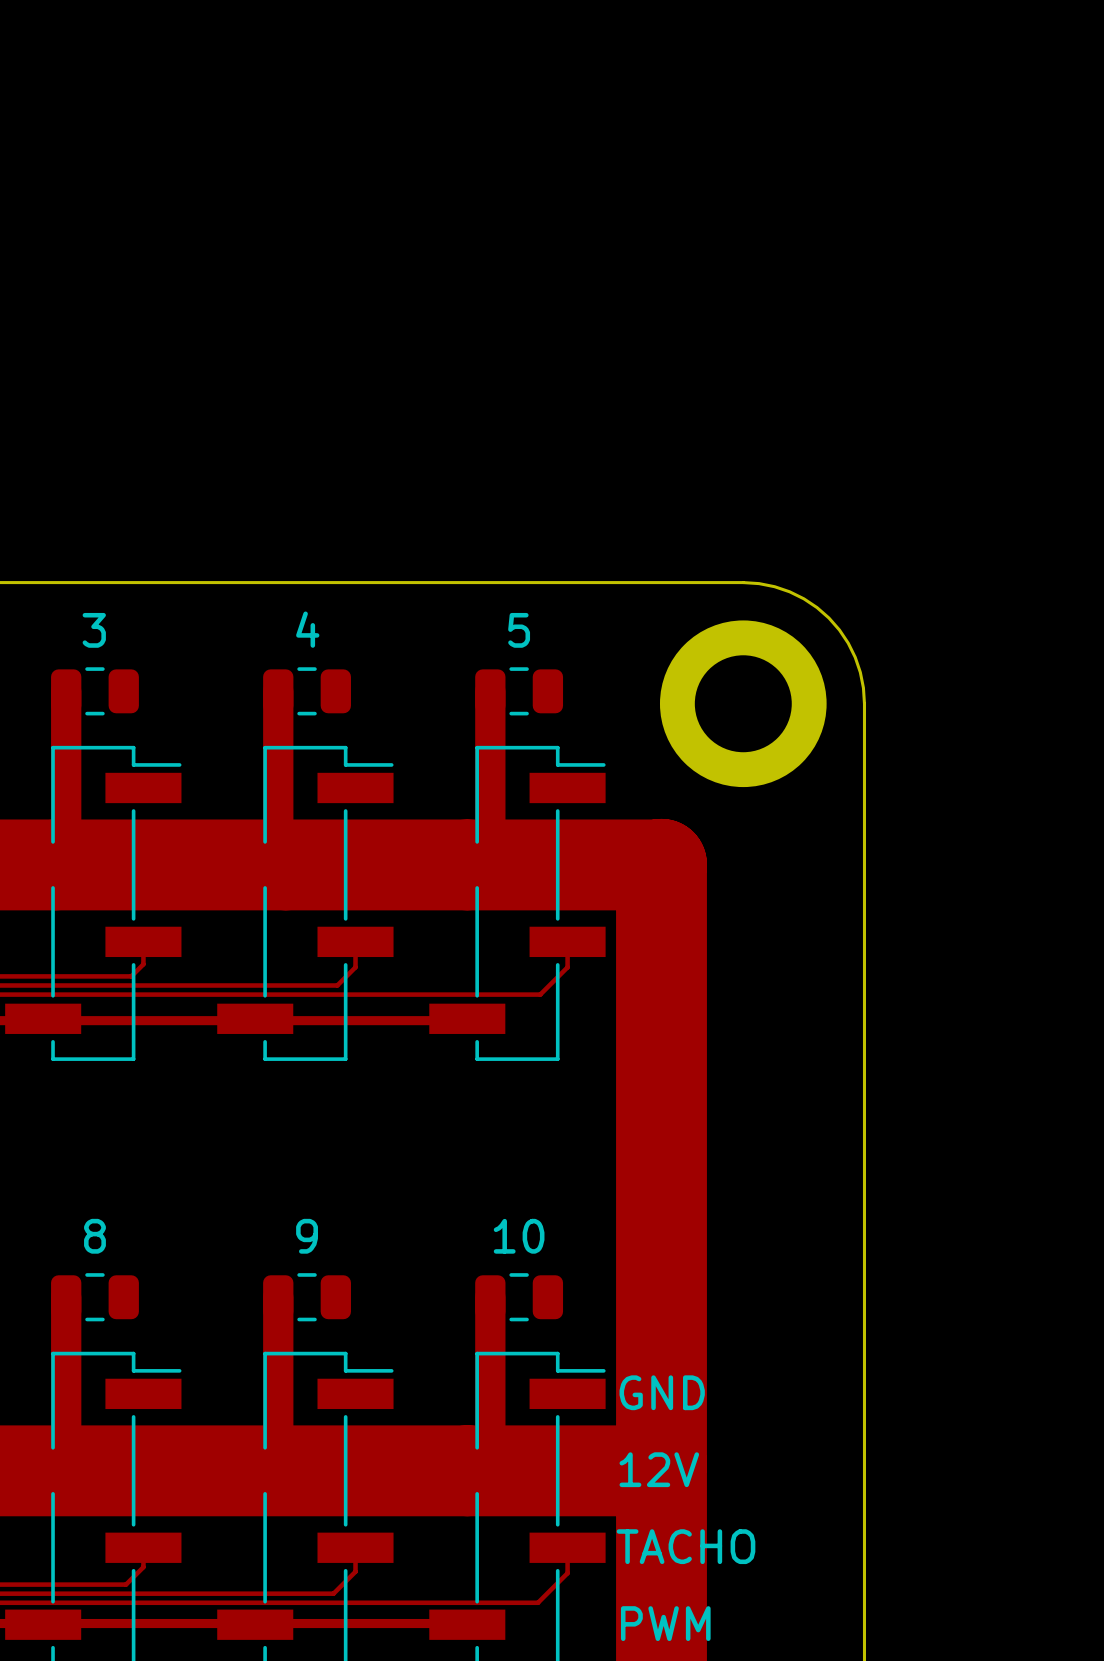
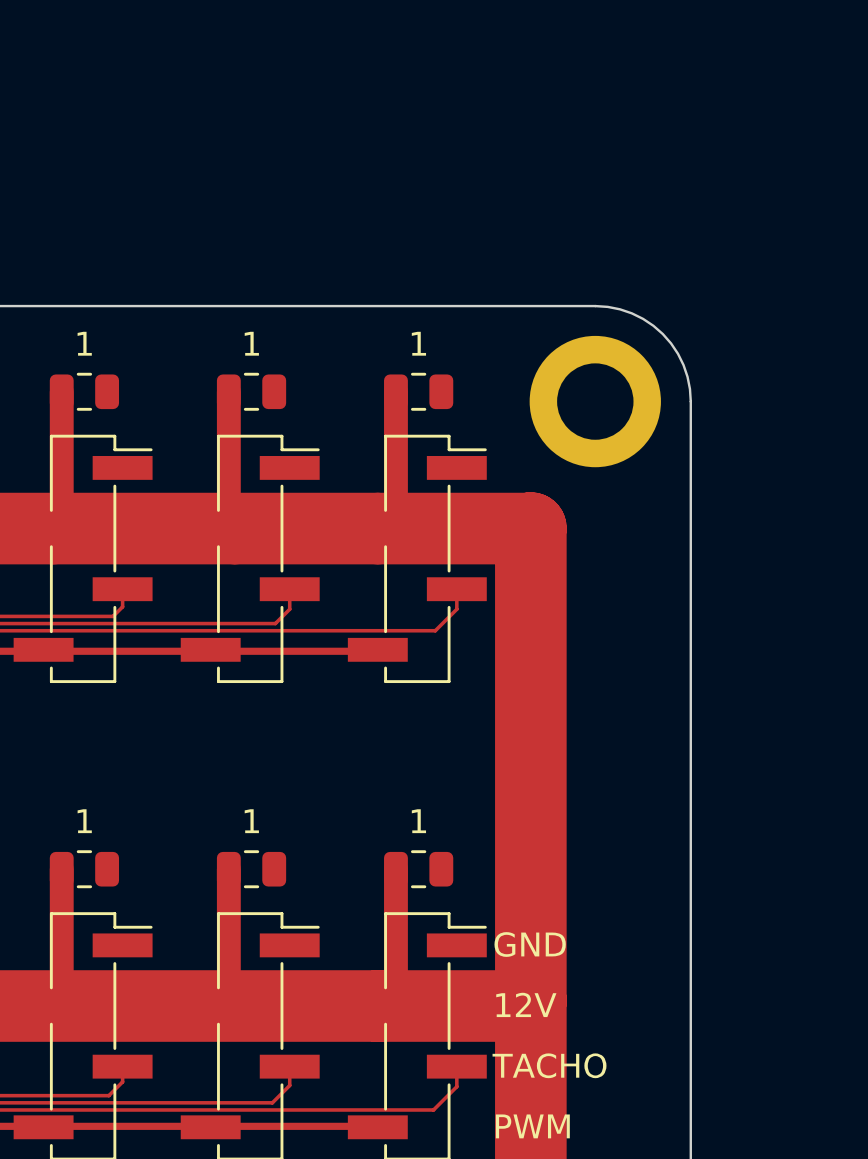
text: 4 (307, 629) -> 1 (251, 343)
text: 3 (94, 630) -> 1 (84, 343)
text: 5 (519, 630) -> 1 (418, 343)
text: 8 (94, 1236) -> 1 (84, 821)
text: 9 (307, 1236) -> 1 (251, 821)
text: 10 (519, 1236) -> 1 (418, 821)

